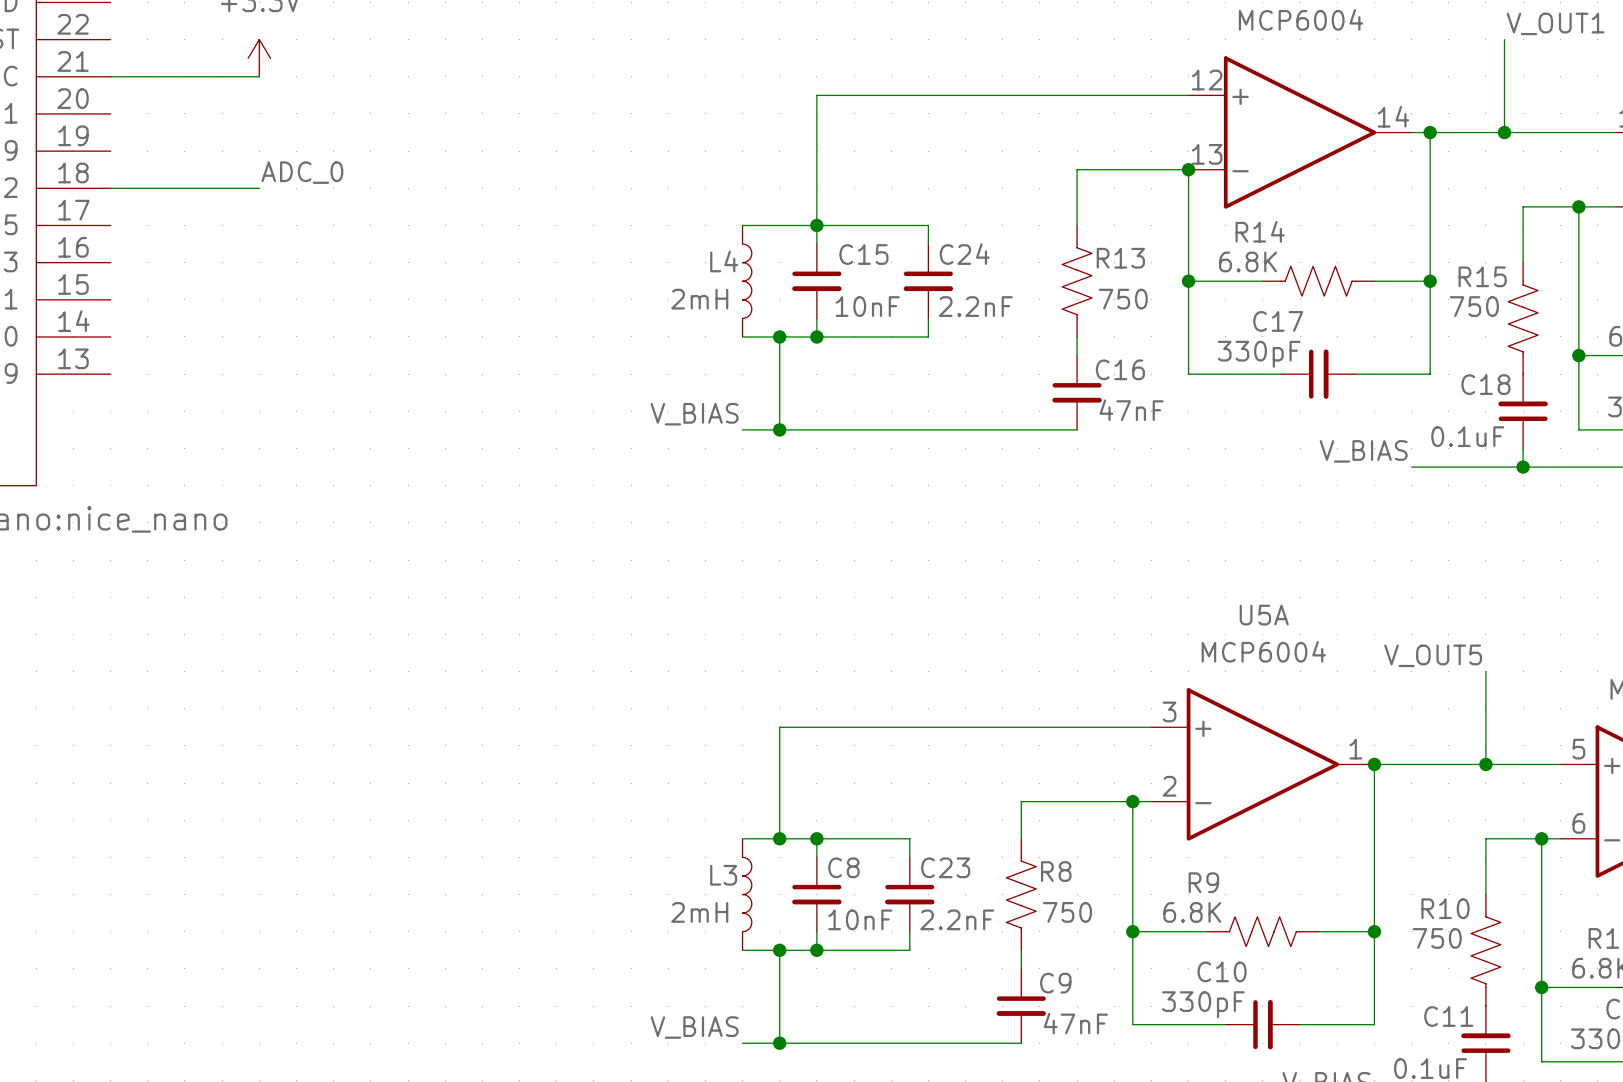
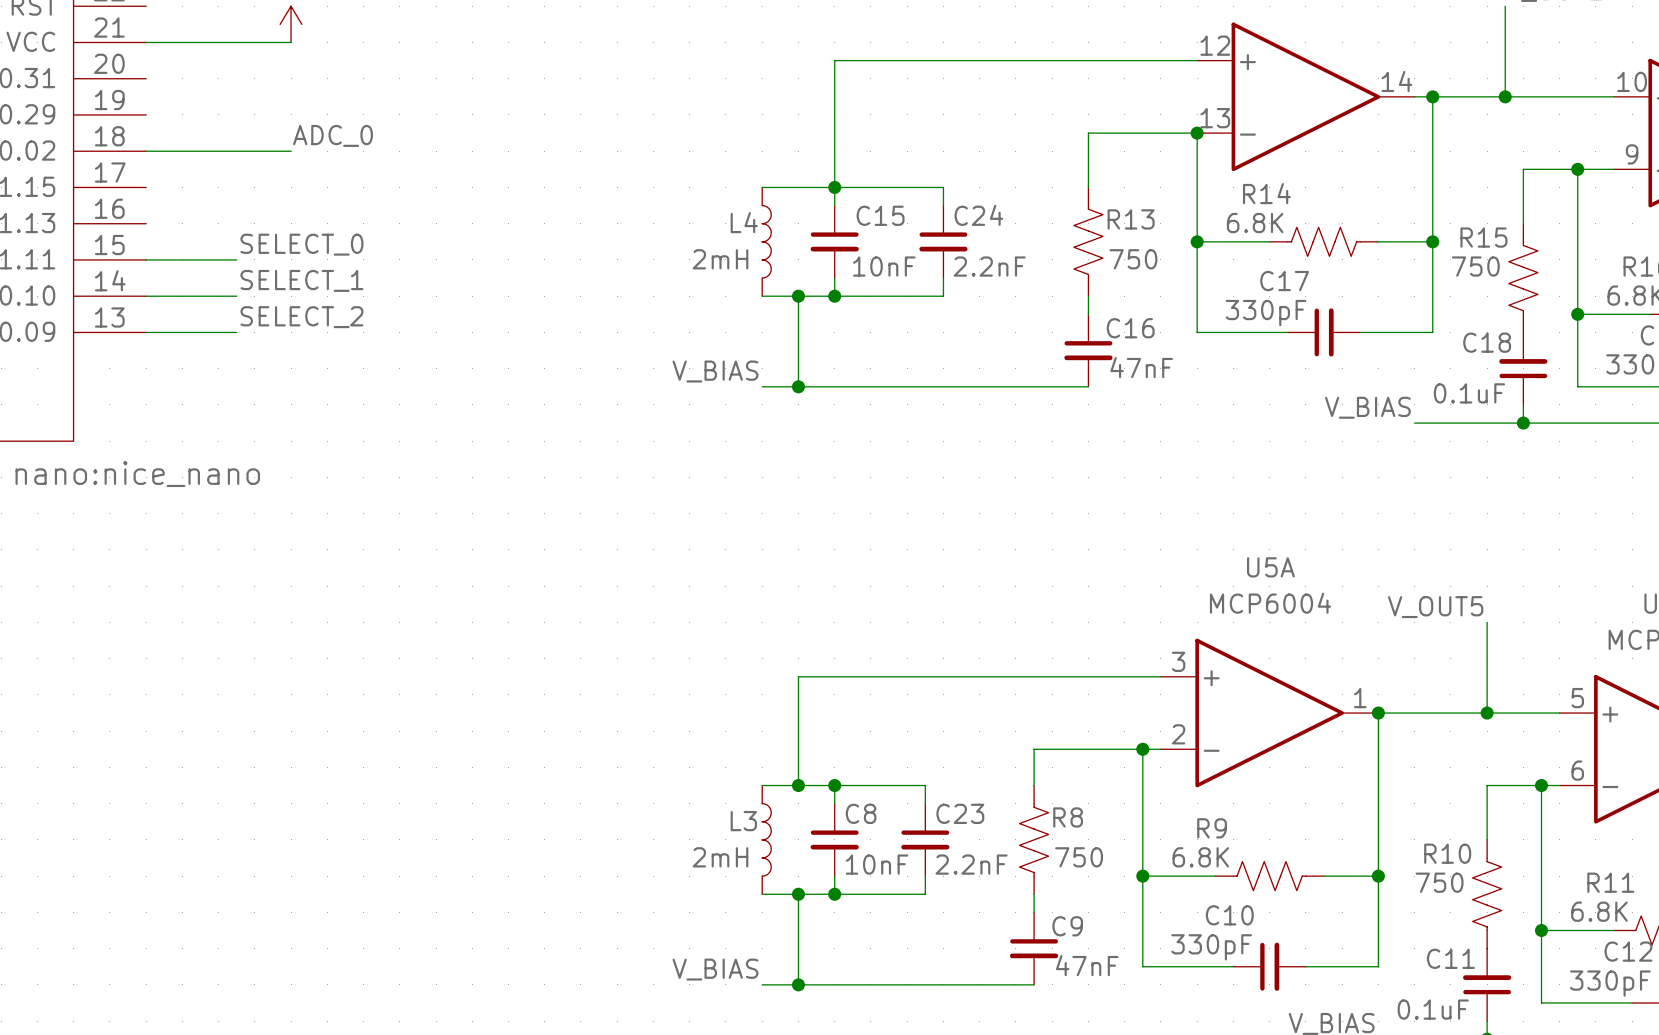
label: none -> SELECT_0 (301, 244)
wire: none -> (146, 259) (236, 259)
label: none -> SELECT_1 (301, 280)
wire: none -> (146, 296) (236, 296)
label: none -> SELECT_2 (301, 317)
wire: none -> (146, 332) (236, 332)

